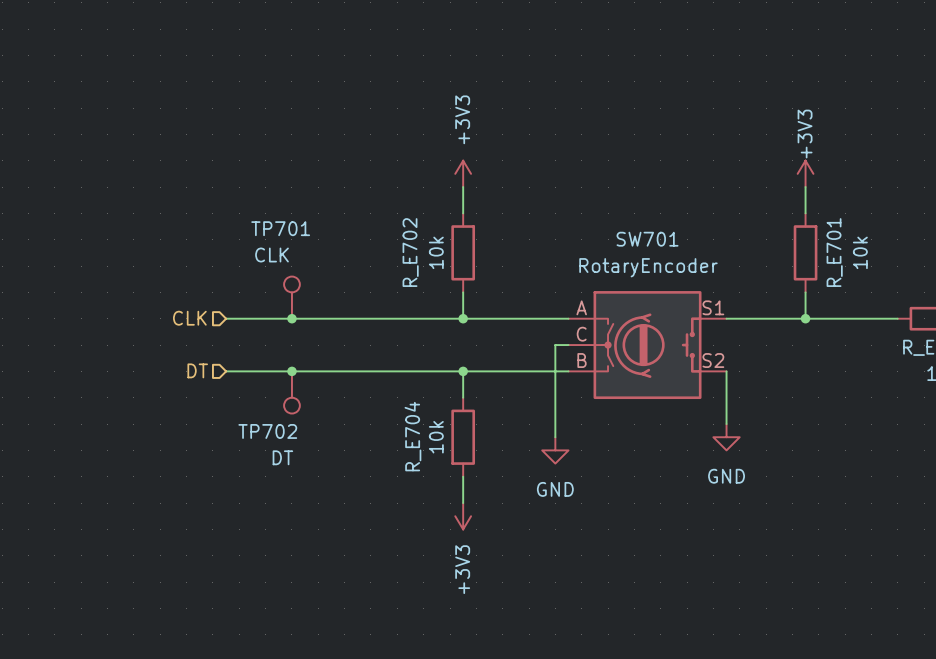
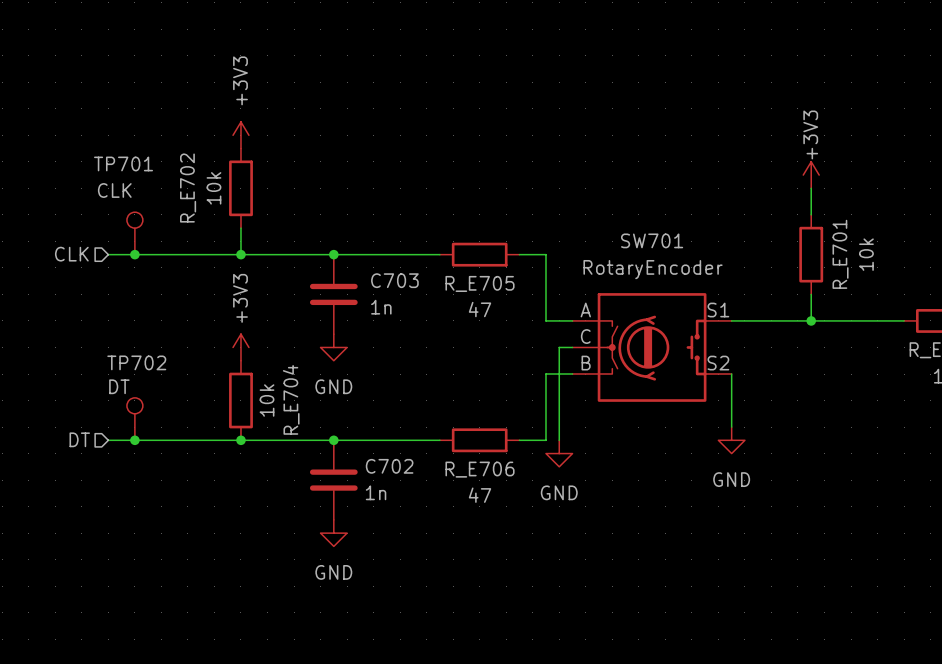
power symbol: none -> +3V3 (240, 135)
power symbol: +3V3 (463, 173) -> none
wire: (463, 187) (463, 213) -> (240, 228) (240, 254)
wire: none -> (108, 254) (439, 254)
junction: none -> (134, 254)
junction: none -> (240, 254)
junction: none -> (333, 254)
R_E702 position: (463, 252) -> (240, 188)
R_E705: none -> 47 (479, 254)
C703: none -> 1n (333, 294)
wire: (463, 292) (463, 318) -> none
TP701 position: (291, 297) -> (134, 233)
hierarchical label position: CLK (189, 318) -> CLK (71, 254)
wire: (226, 318) (542, 318) -> (519, 254) (546, 254) (546, 320)
junction: (291, 318) -> none
junction: (463, 318) -> none
power symbol: none -> +3V3 (240, 347)
power symbol: none -> GND (333, 347)
hierarchical label position: DT (197, 370) -> DT (79, 439)
wire: (226, 371) (542, 371) -> (519, 440) (546, 440) (546, 374)
junction: (291, 371) -> none
wire: (463, 371) (463, 397) -> none
junction: (463, 371) -> none
TP702 position: (291, 392) -> (134, 419)
TP702 rotation: 0° (291, 405) -> 180° (134, 405)
TP702 name position: TP702 (267, 431) -> TP702 (136, 362)
R_E704 name position: R_E704 (412, 436) -> R_E704 (291, 399)
wire: none -> (108, 440) (439, 440)
junction: none -> (134, 440)
junction: none -> (240, 440)
junction: none -> (333, 440)
R_E704 value position: 10k (436, 437) -> 10k (267, 400)
R_E704 position: (463, 437) -> (240, 400)
R_E706: none -> 47 (479, 440)
TP702 value position: DT (282, 457) -> DT (119, 386)
C702: none -> 1n (333, 480)
wire: (463, 476) (463, 503) -> none
power symbol: +3V3 (463, 516) -> none
power symbol: none -> GND (333, 533)

